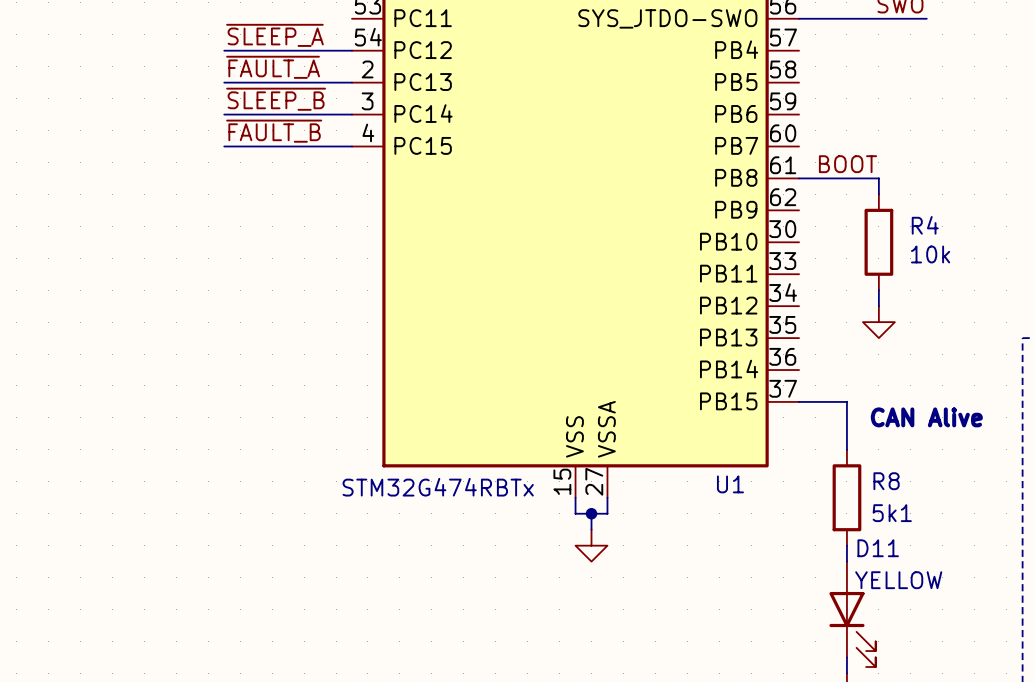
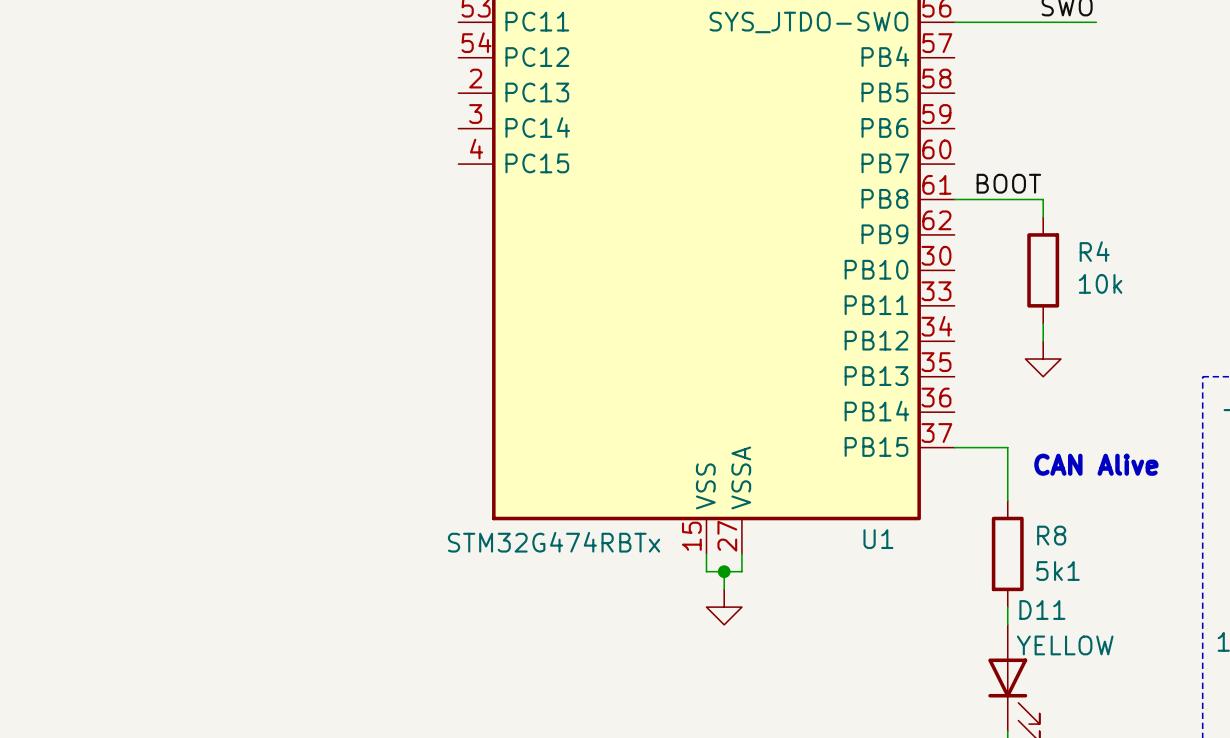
label: ~{SLEEP_A} (274, 35) -> none
wire: (224, 50) (352, 50) -> none
label: ~{FAULT_A} (273, 67) -> none
wire: (224, 82) (352, 82) -> none
label: ~{SLEEP_B} (276, 99) -> none
wire: (224, 114) (352, 114) -> none
label: ~{FAULT_B} (274, 131) -> none
wire: (224, 146) (352, 146) -> none

